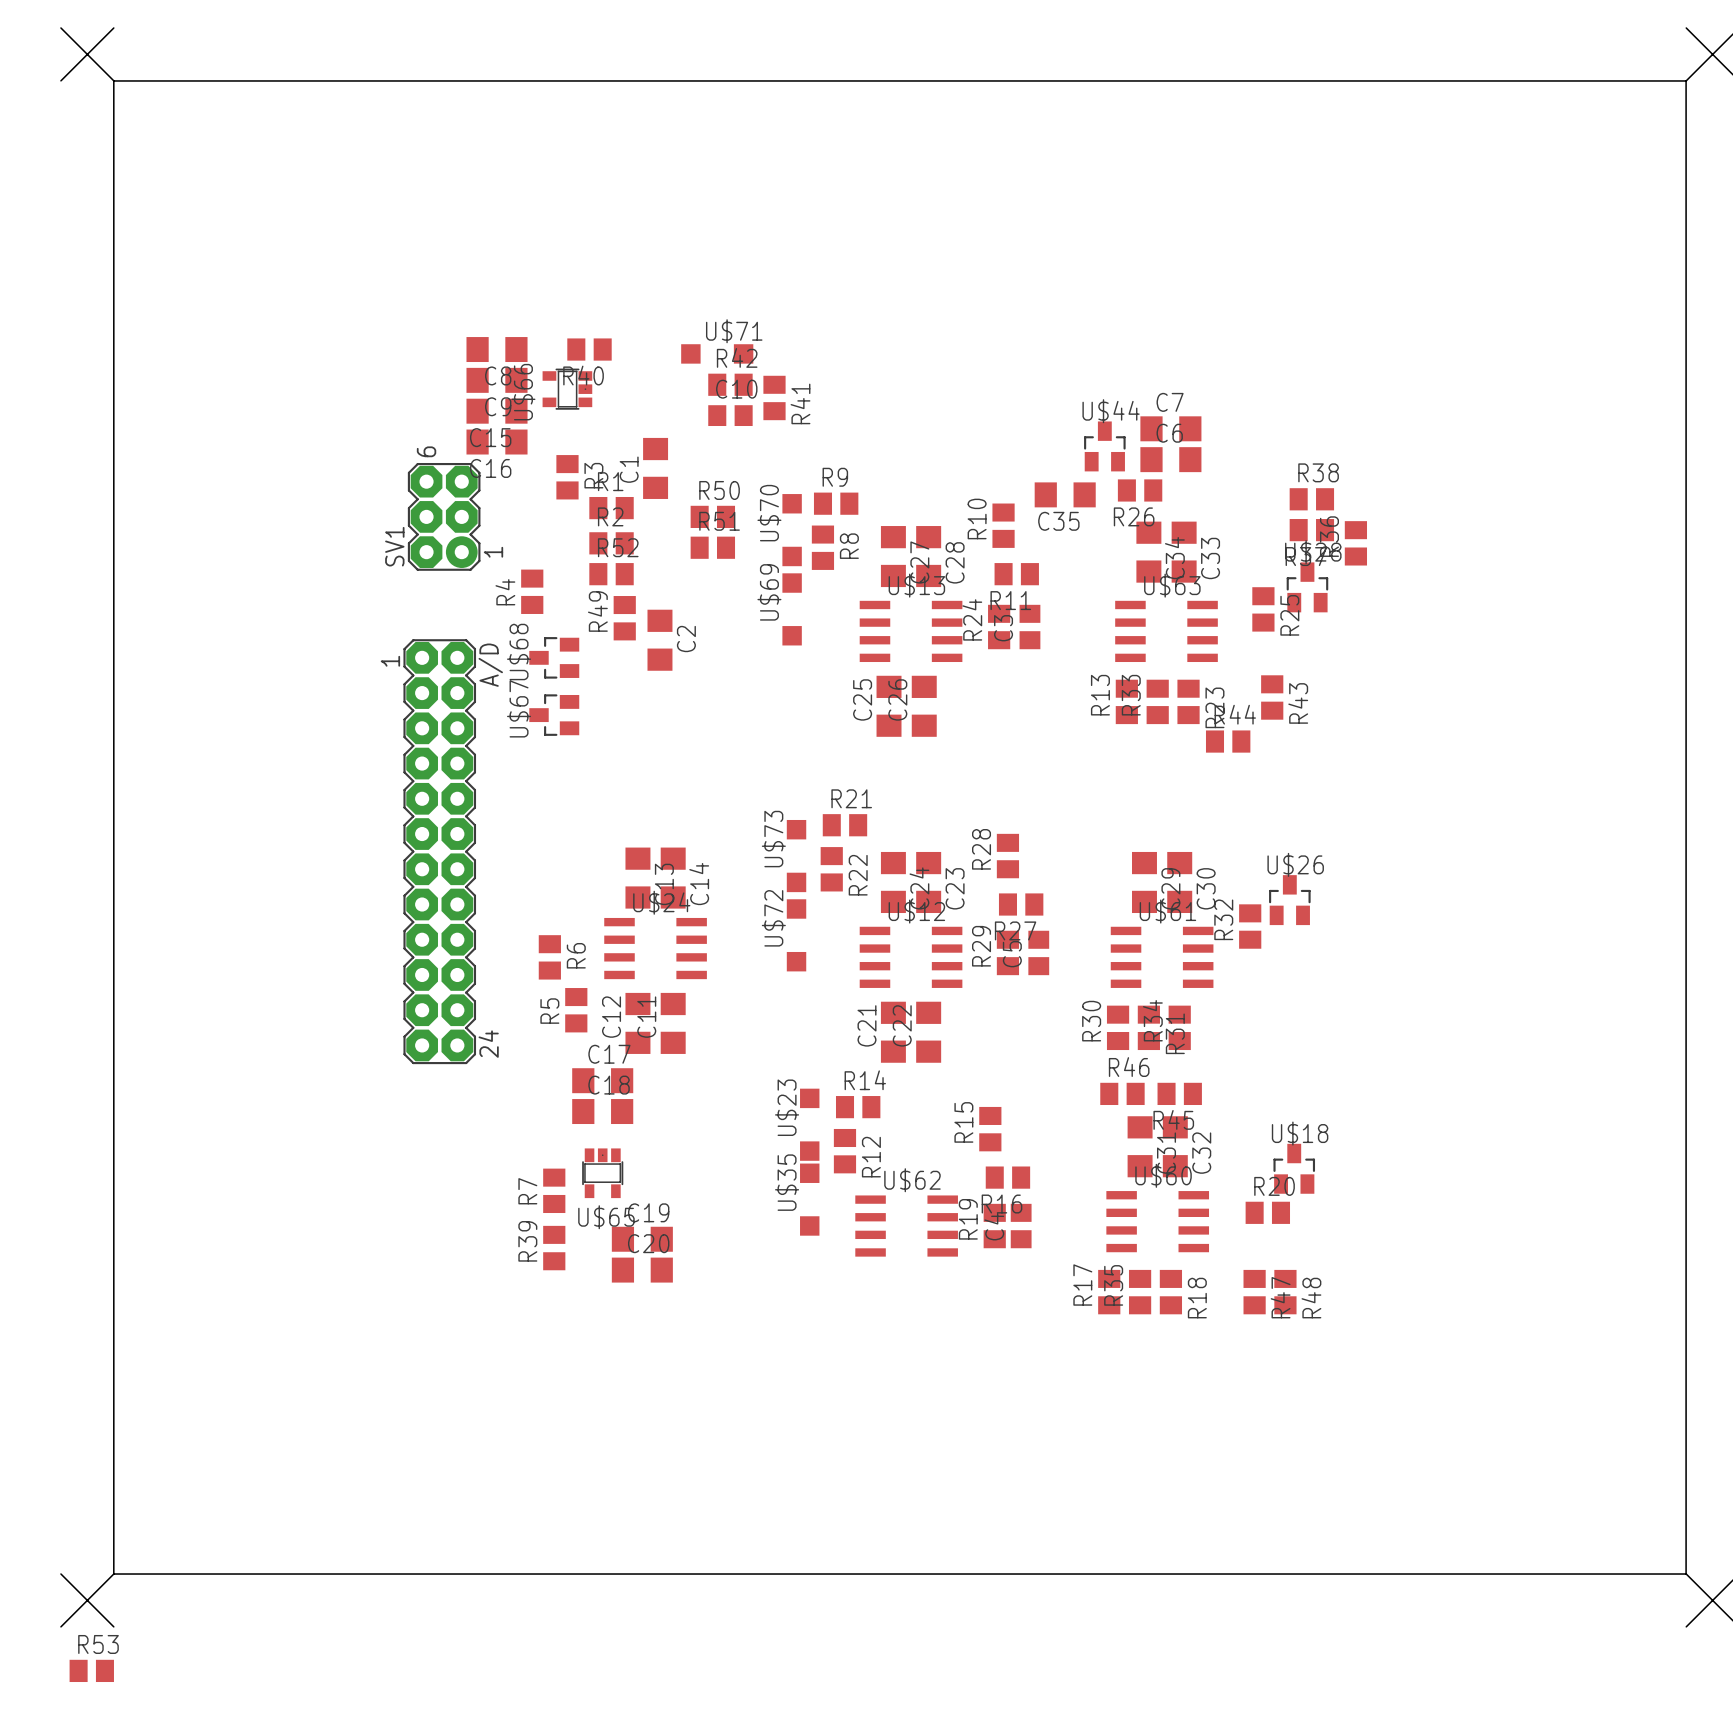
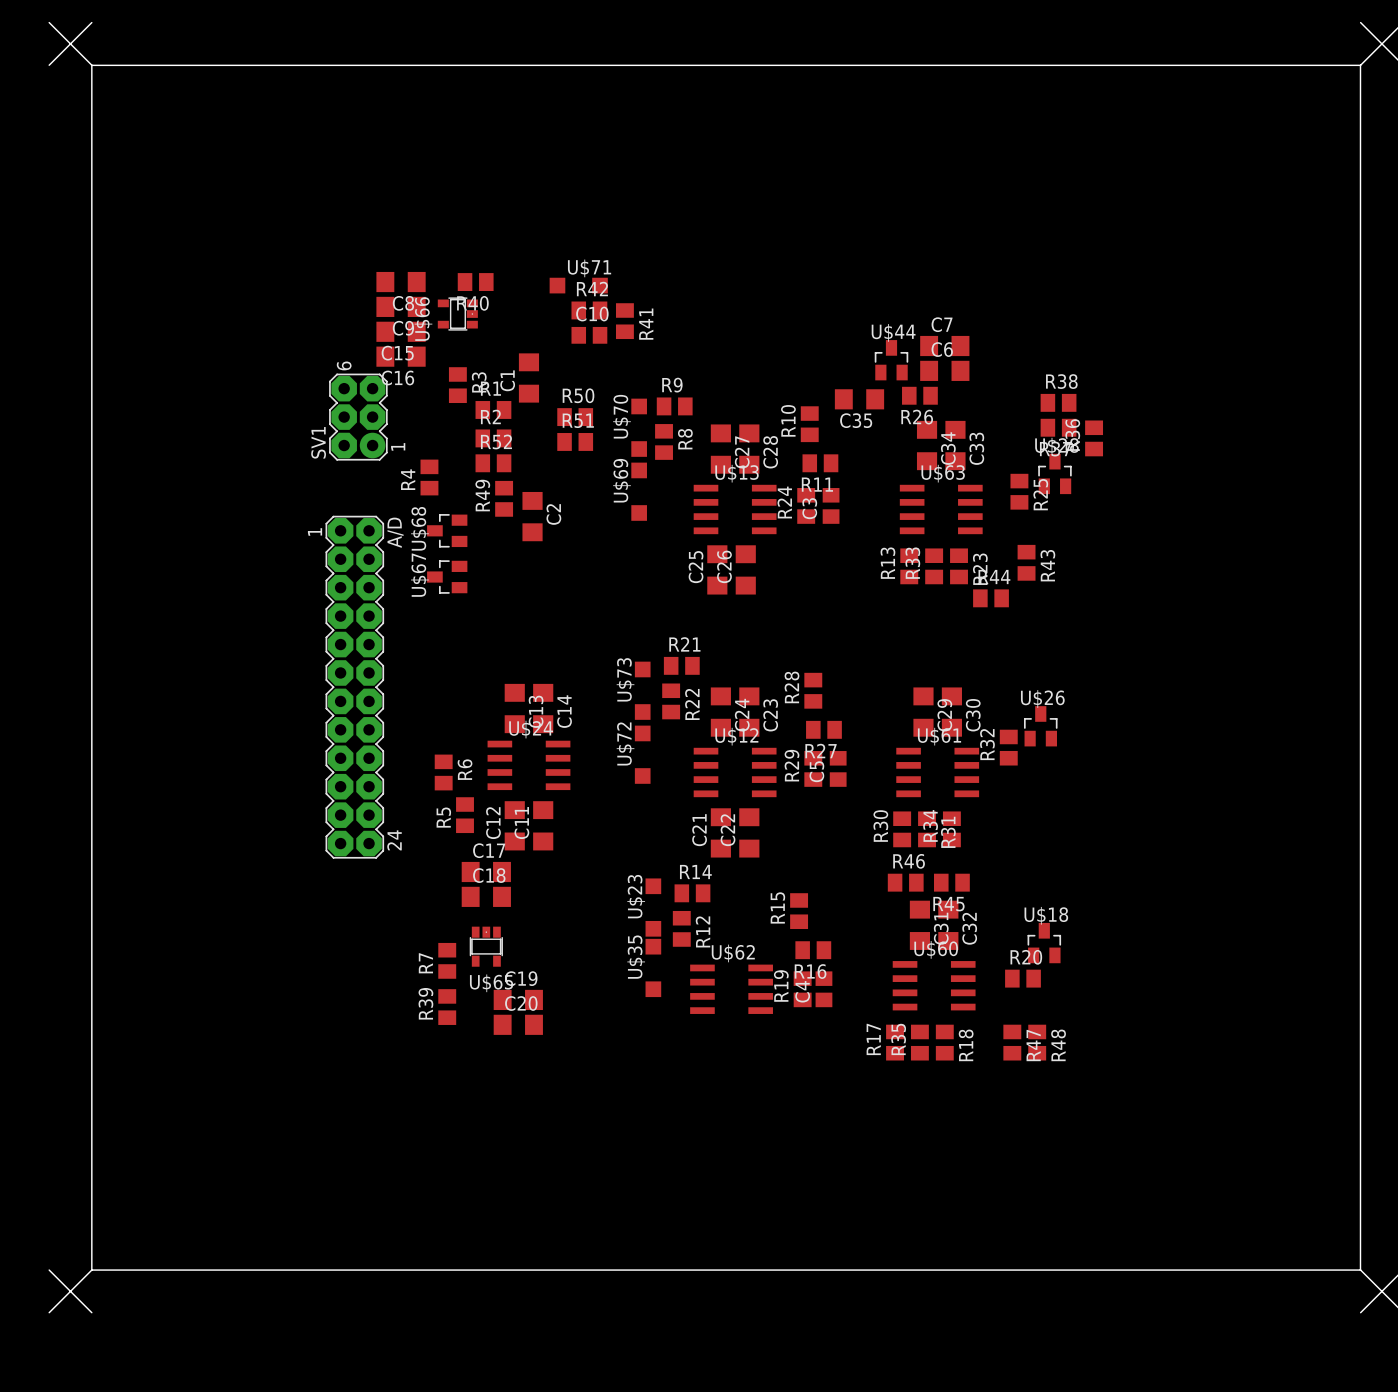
R53: (91, 1670) -> none

